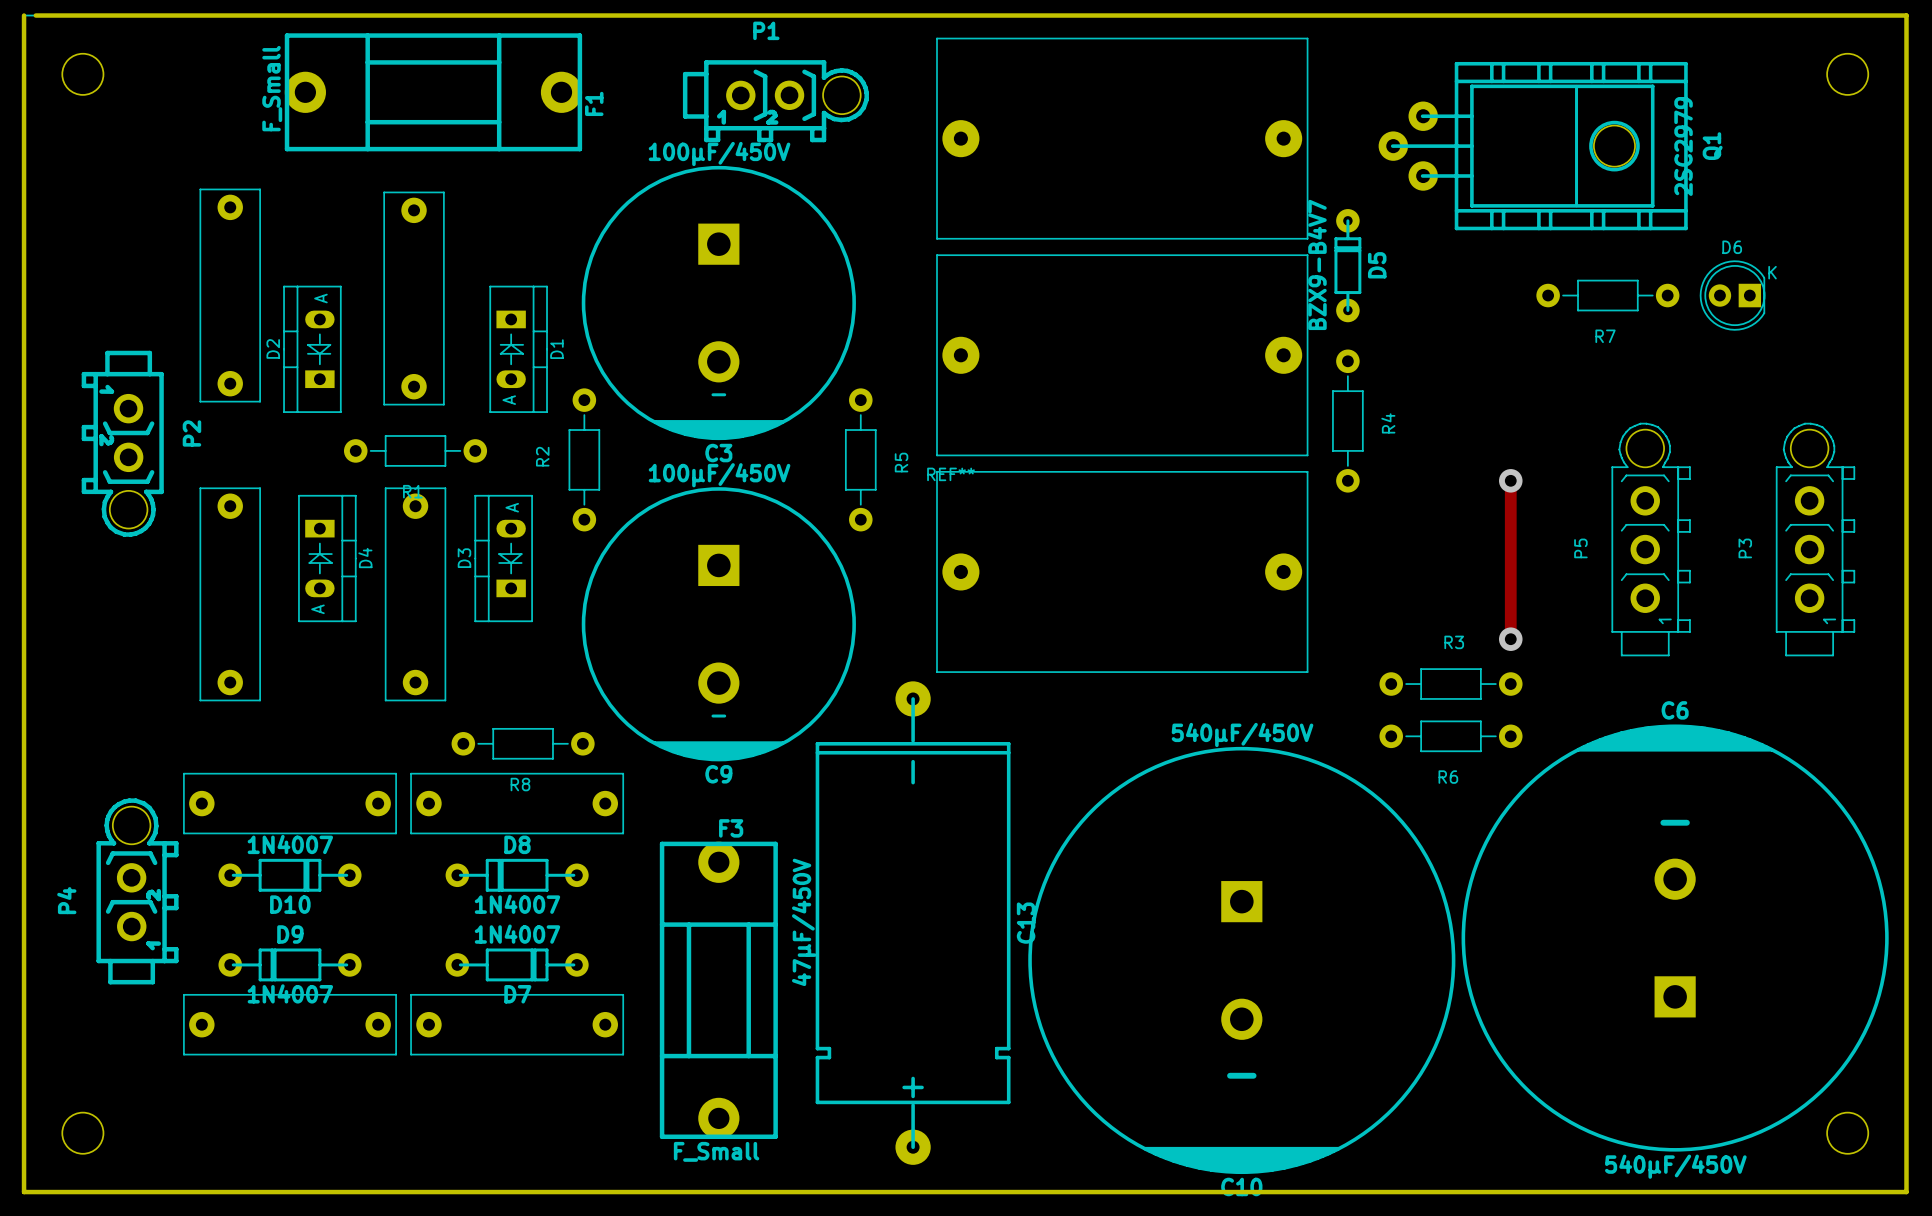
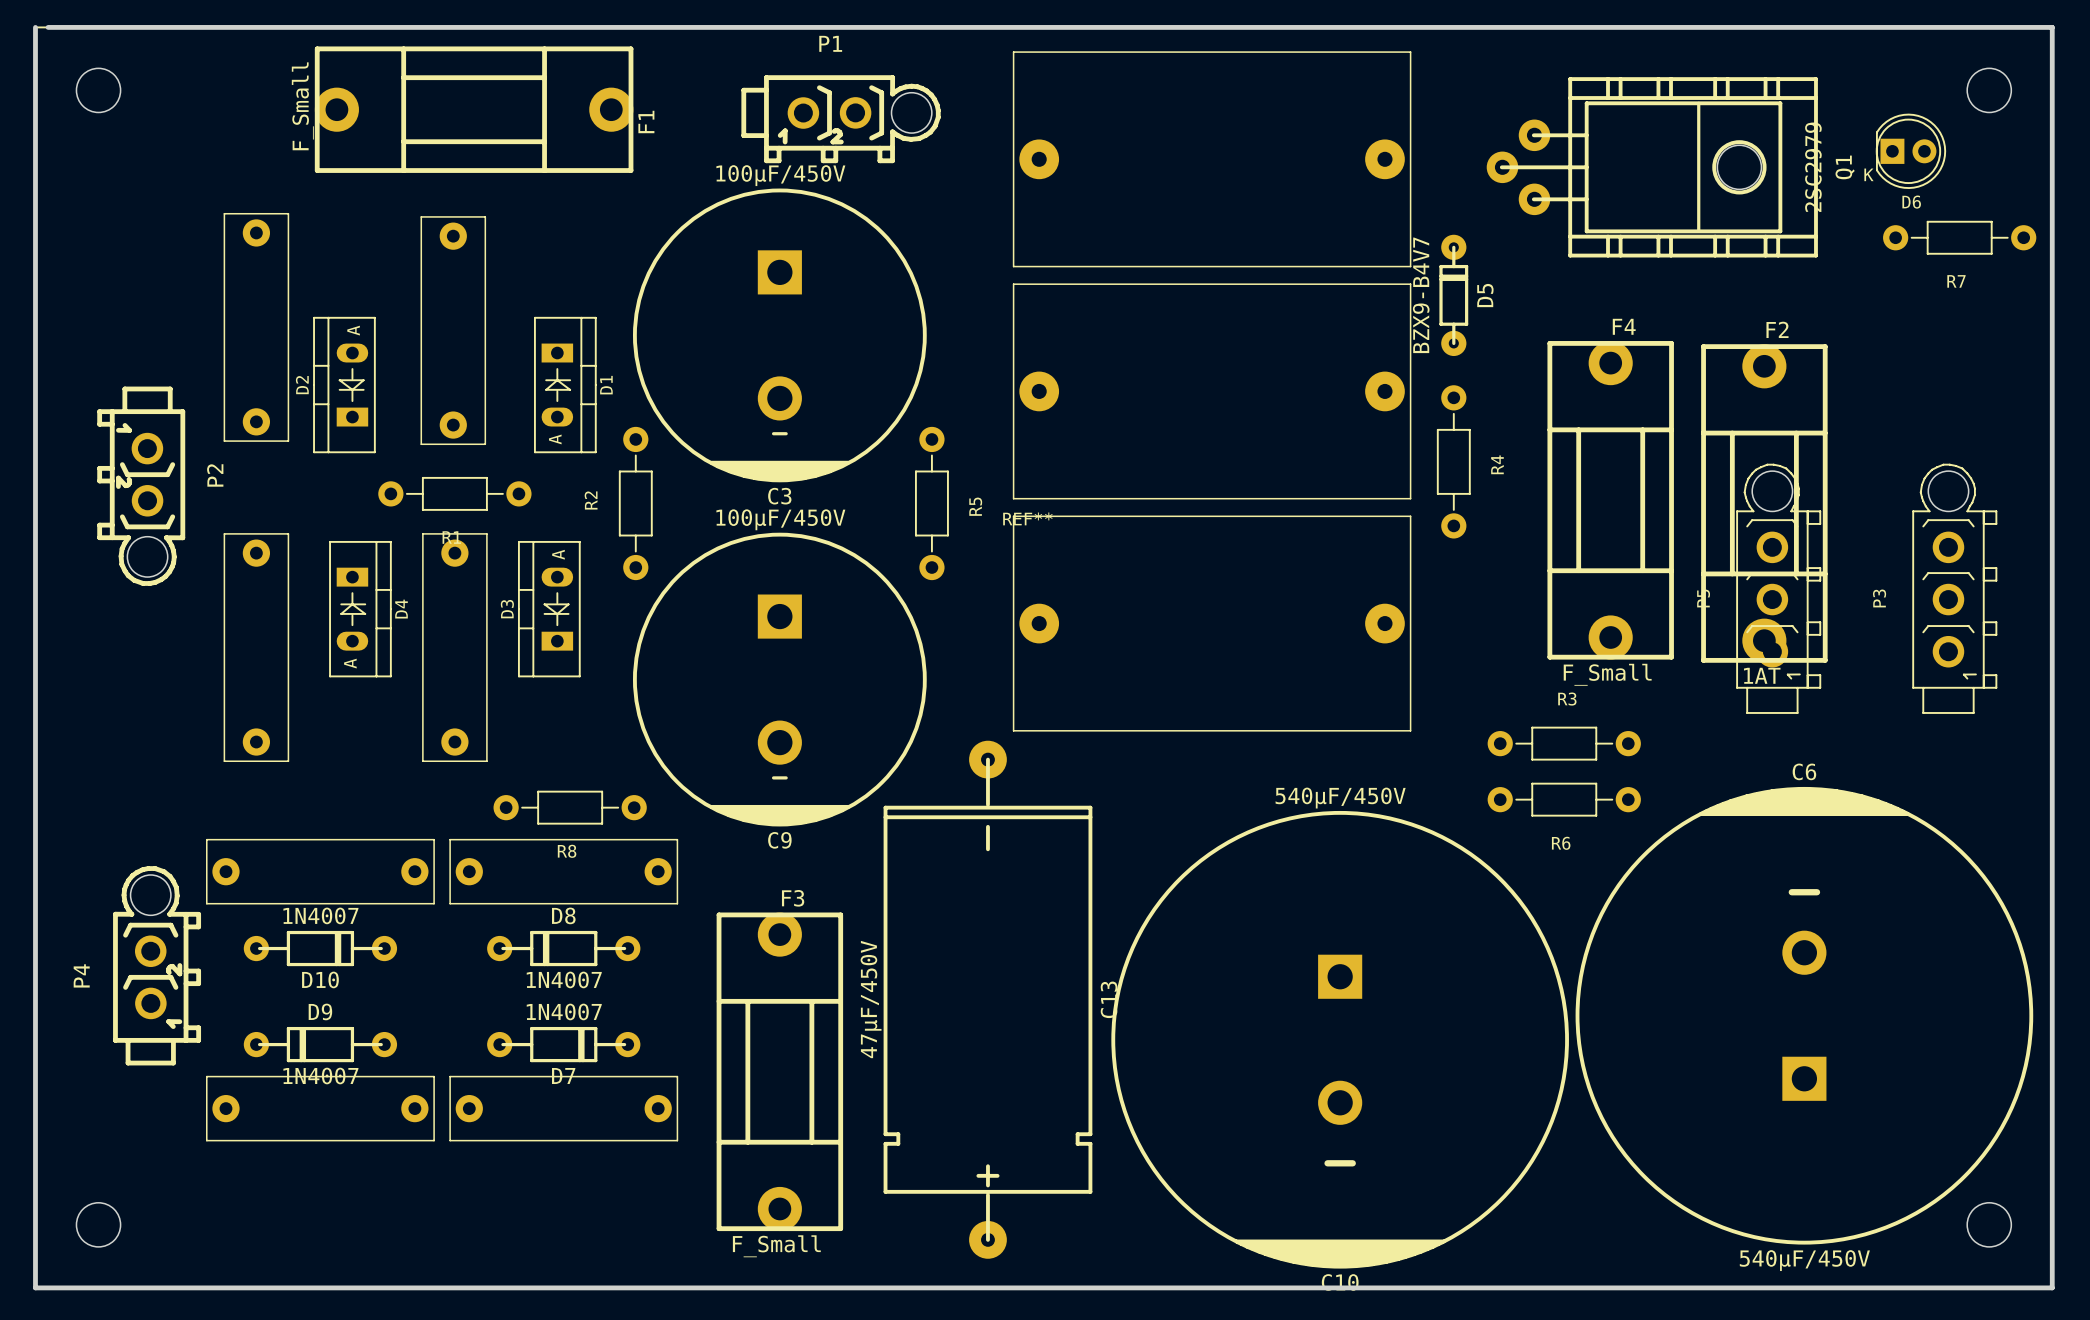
R7 position: (1607, 295) -> (1959, 237)
D6 rotation: 0° (1732, 295) -> 180° (1910, 151)
D6 position: (1732, 295) -> (1910, 151)
F4: none -> F_Small (1610, 500)
F2: none -> 1AT (1764, 503)
track: (1510, 480) (1510, 639) -> none
via: (1510, 480) -> none
via: (1510, 639) -> none

